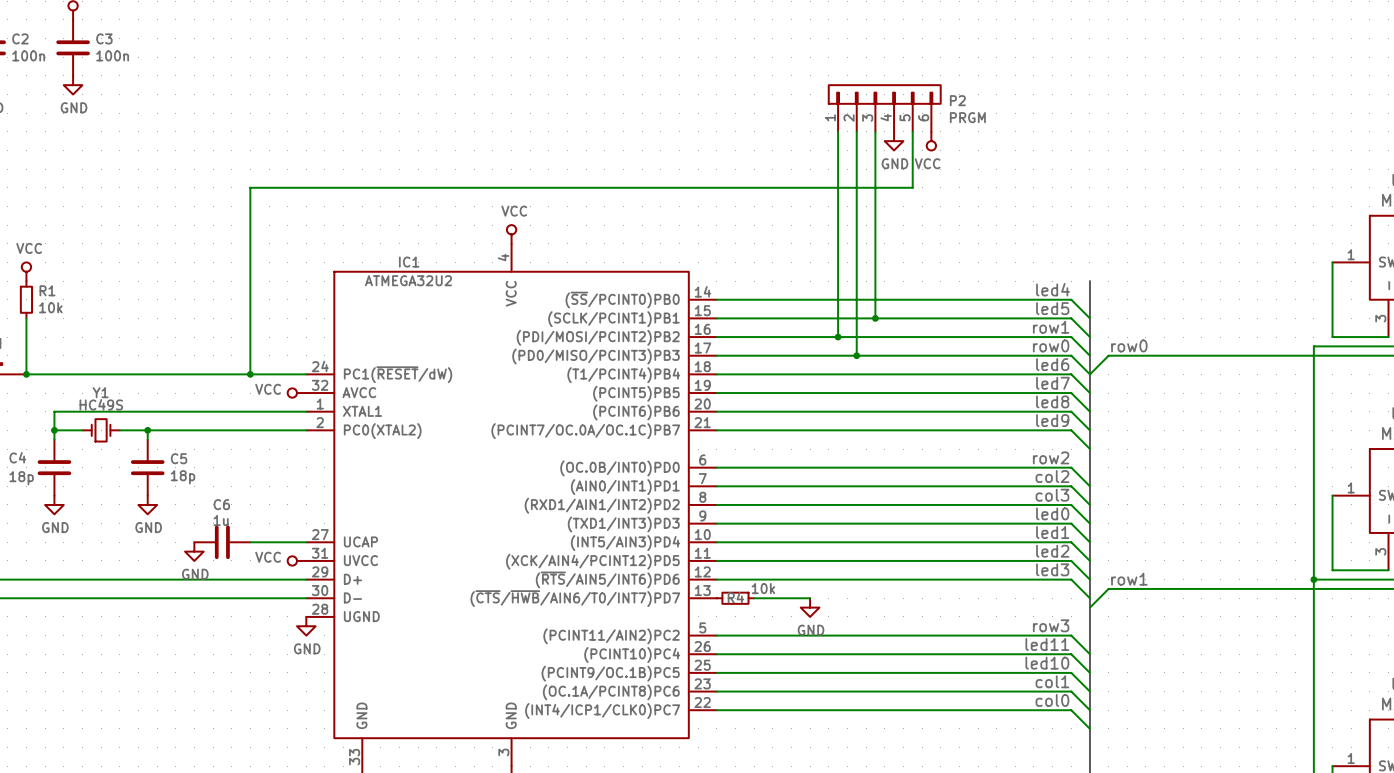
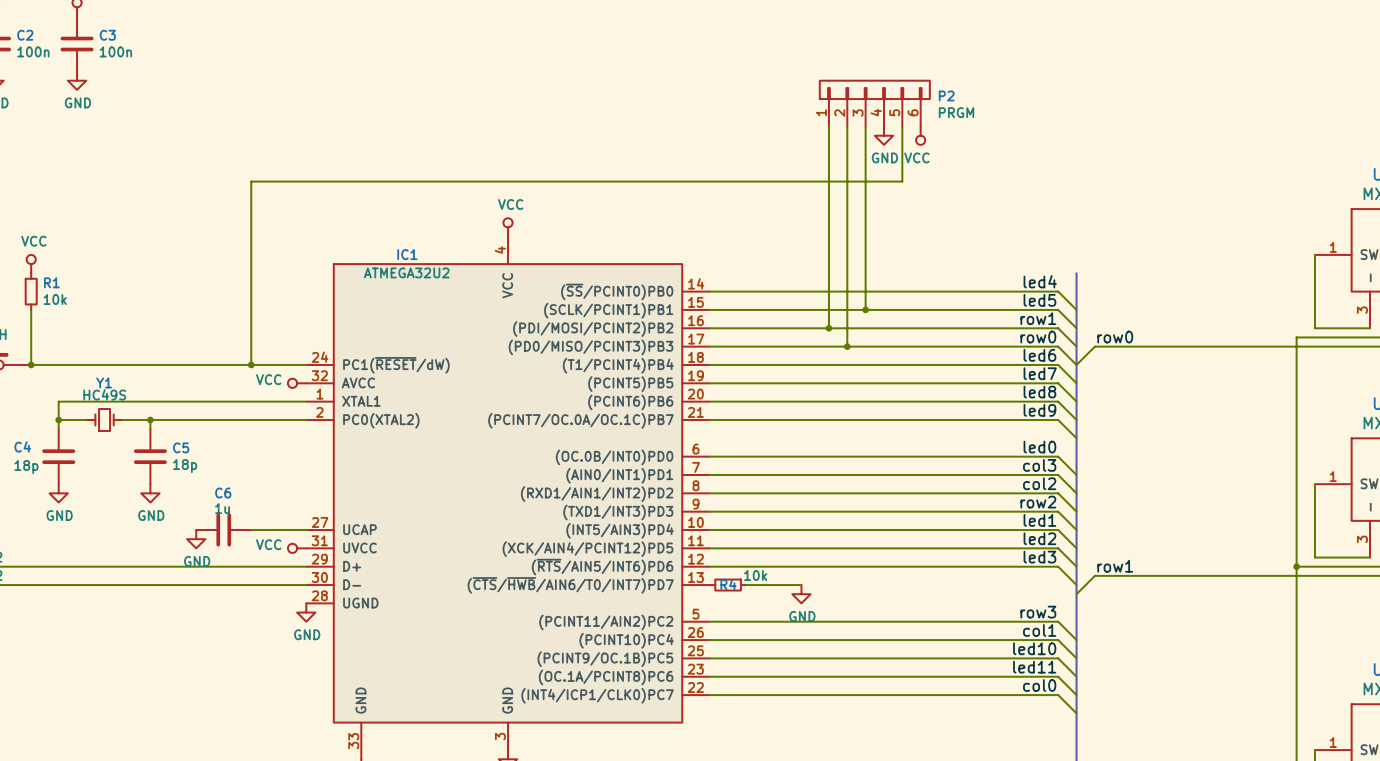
label: row2 (1051, 457) -> led0 (1039, 447)
label: col2 (1052, 476) -> col3 (1039, 465)
label: col3 (1052, 495) -> col2 (1039, 483)
label: led0 (1052, 513) -> row2 (1038, 502)
label: led11 (1047, 644) -> col1 (1039, 630)
label: col1 (1052, 681) -> led11 (1034, 667)

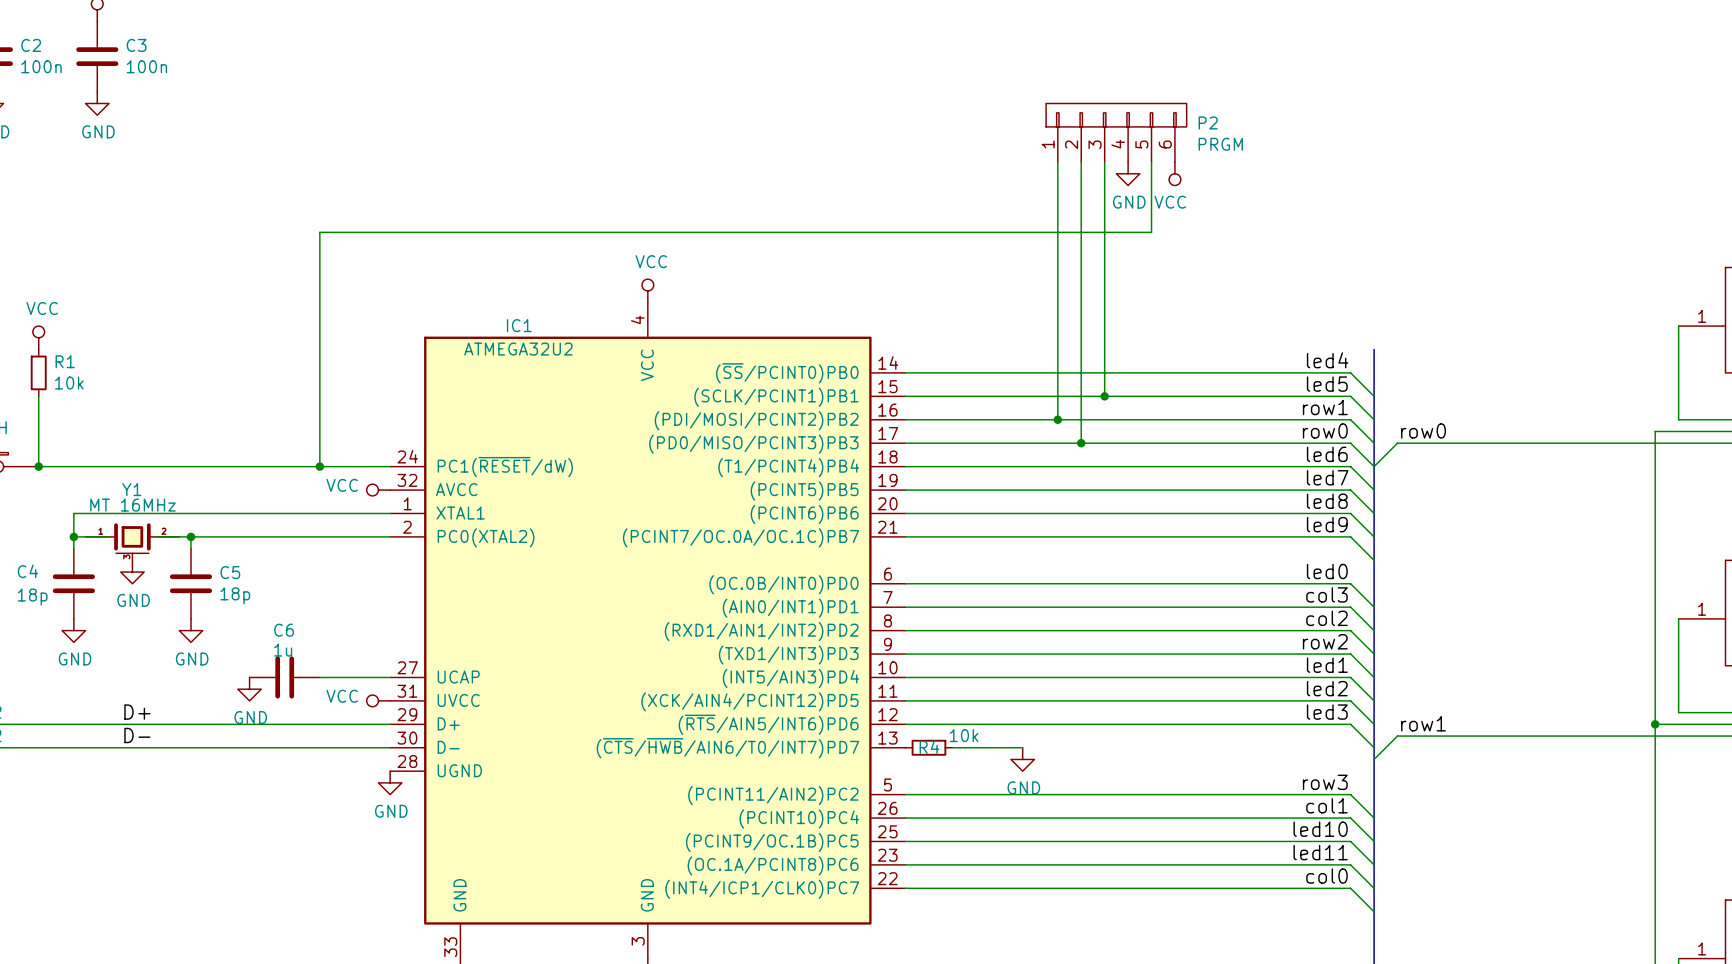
Y1 value: HC49S (104, 394) -> MT 16MHz (132, 505)
Y1 symbol: [86, 408, 123, 431] -> [85, 523, 180, 561]
power symbol: none -> GND (132, 572)
label: none -> D+ (137, 712)
label: none -> D- (137, 735)

